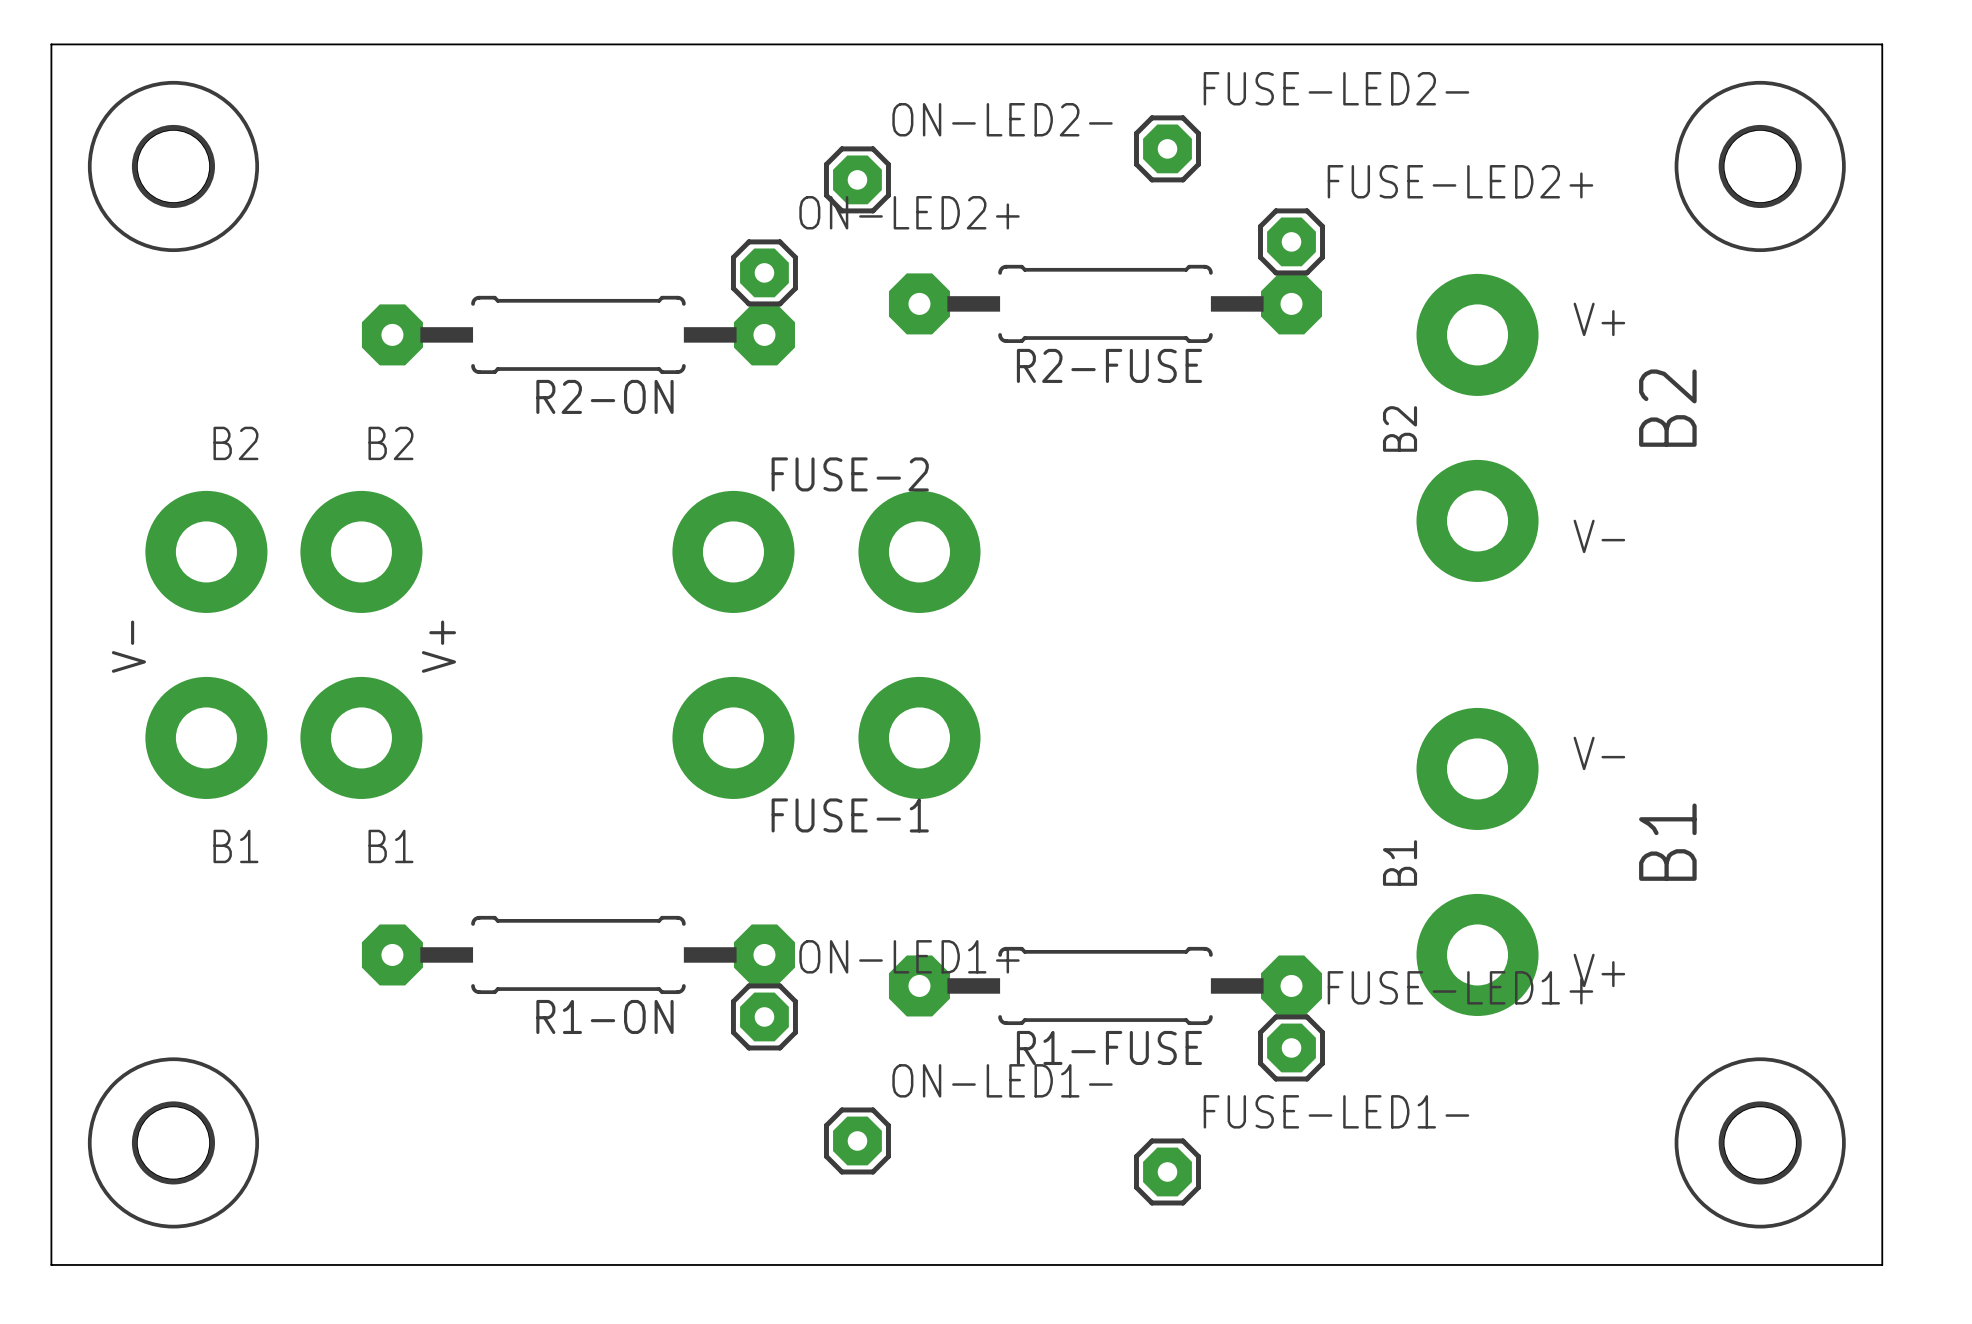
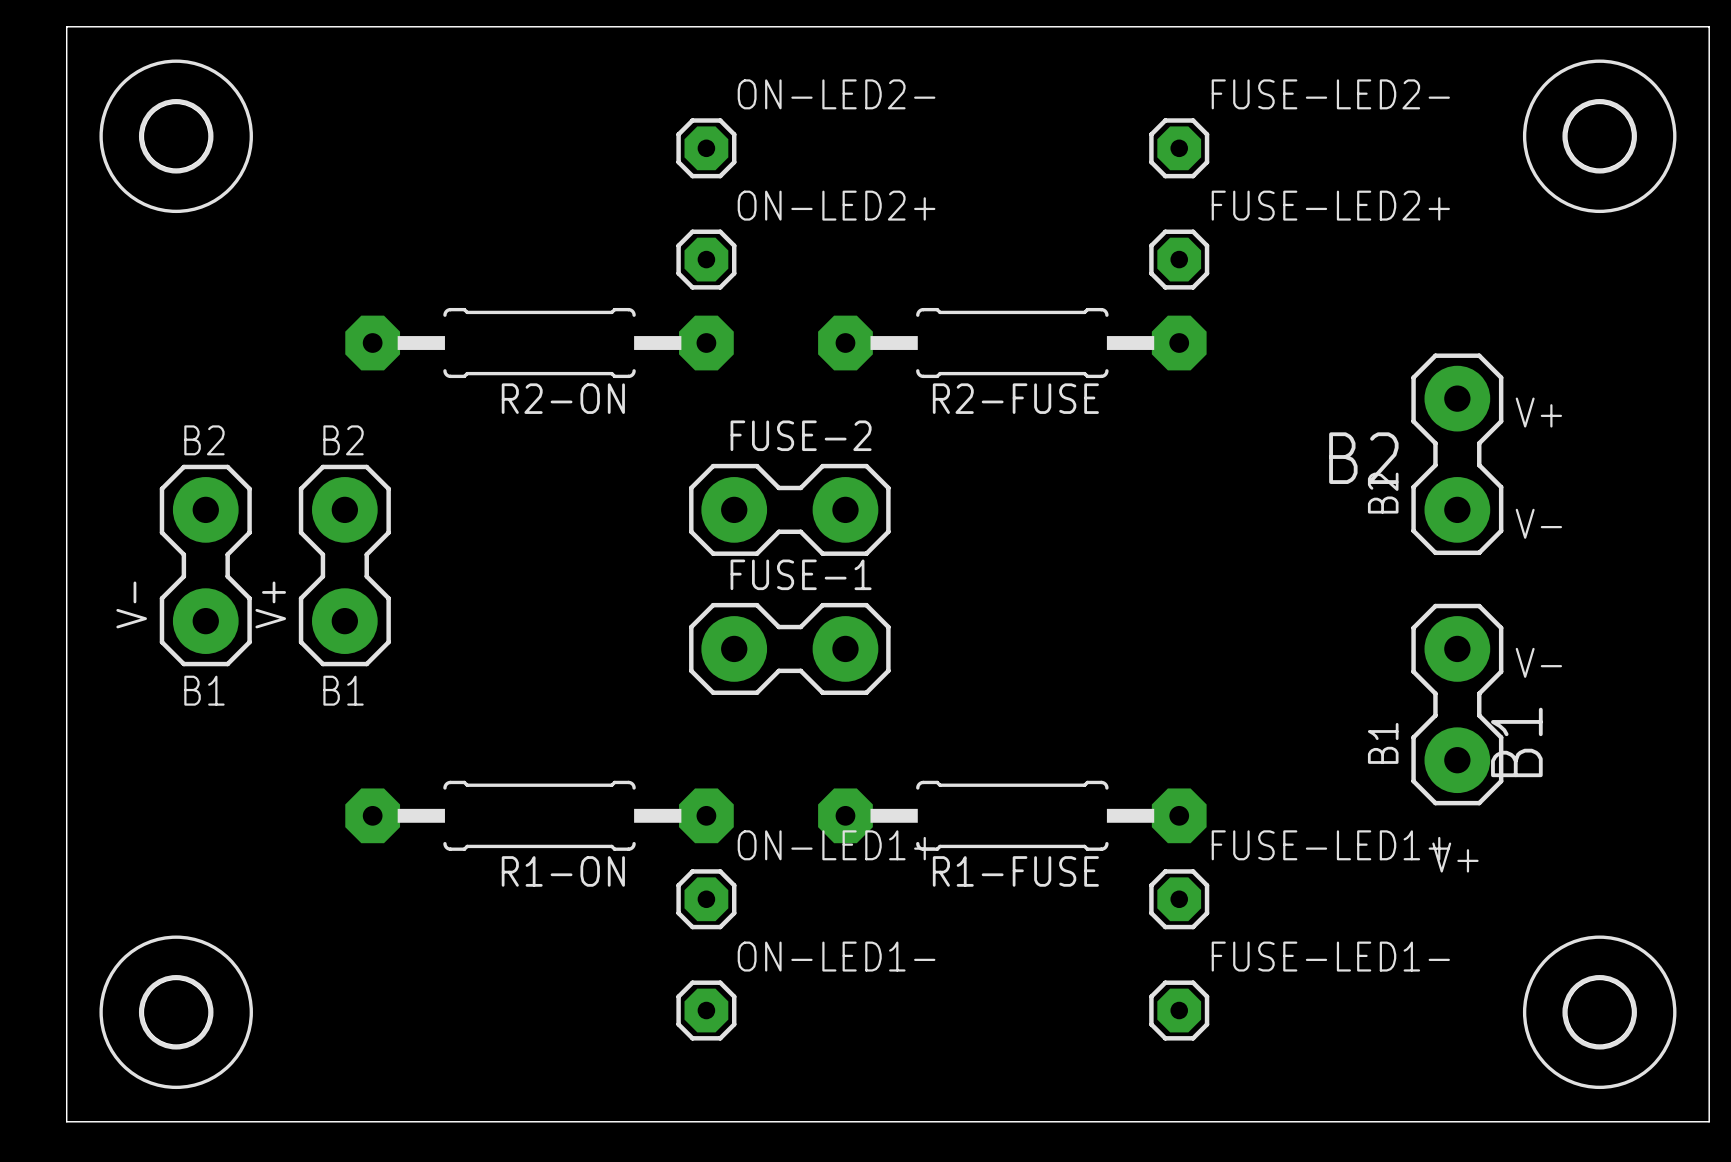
FUSE-LED2- position: (1167, 148) -> (1179, 148)
ON-LED2- position: (857, 179) -> (706, 148)
FUSE-LED2+ position: (1291, 241) -> (1179, 259)
ON-LED2+ position: (764, 272) -> (706, 259)
B2 footprint: [1416, 273, 1539, 582] -> [1411, 353, 1504, 556]
R2-FUSE position: (1105, 303) -> (1012, 343)
text position: V+ (1599, 319) -> V+ (1538, 412)
R2-ON position: (578, 334) -> (539, 343)
text rotation: 0° (1667, 408) -> 90° clockwise (1363, 458)
text position: B2 (1667, 408) -> B2 (1363, 458)
text position: B2 (235, 443) -> B2 (204, 440)
text position: B2 (390, 443) -> B2 (343, 440)
V- footprint: [145, 490, 268, 799] -> [159, 464, 252, 667]
V+ footprint: [300, 490, 423, 799] -> [298, 464, 391, 667]
FUSE-2 footprint: [672, 490, 981, 613] -> [689, 463, 891, 556]
text: V- (1599, 536) -> none
text: none -> V- (1538, 523)
V+ name position: V+ (438, 646) -> V+ (270, 604)
FUSE-1 footprint: [672, 676, 981, 799] -> [689, 602, 891, 695]
B1 footprint: [1416, 707, 1539, 1016] -> [1411, 603, 1504, 806]
text: V- (1599, 753) -> none
text: none -> V- (1538, 662)
FUSE-1 name position: FUSE-1 (850, 815) -> FUSE-1 (801, 574)
text position: B1 (235, 846) -> B1 (204, 690)
text position: B1 (390, 846) -> B1 (343, 690)
R1-ON position: (578, 954) -> (539, 815)
R1-FUSE position: (1105, 985) -> (1012, 815)
FUSE-LED1+ position: (1291, 1047) -> (1179, 899)
ON-LED1- position: (857, 1140) -> (706, 1010)
FUSE-LED1- position: (1167, 1171) -> (1179, 1010)

